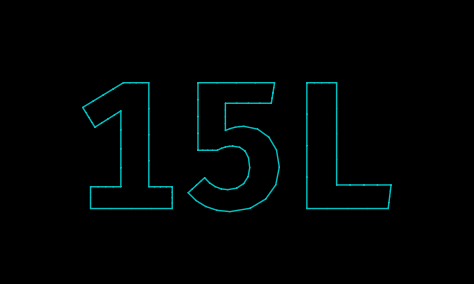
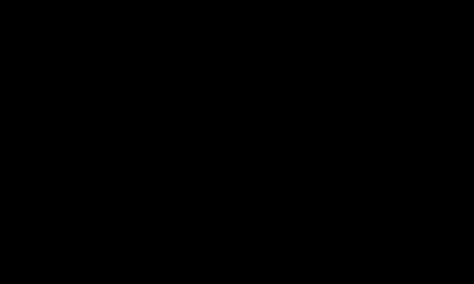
line: (123, 82) (148, 82) (148, 186) (172, 186) (172, 208) (90, 208) (90, 186) (120, 186) (120, 110) (94, 127) (82, 107) (123, 82) -> none
line: (197, 82) (274, 82) (271, 103) (225, 103) (225, 130) (243, 126) (257, 129) (268, 137) (276, 150) (279, 167) (275, 184) (265, 198) (250, 208) (229, 211) (217, 210) (205, 206) (188, 192) (204, 177) (209, 182) (221, 188) (236, 188) (243, 183) (248, 176) (249, 167) (248, 157) (245, 151) (239, 147) (229, 146) (217, 150) (197, 150) (197, 82) -> none
line: (306, 82) (306, 208) (388, 208) (391, 184) (336, 184) (336, 82) (306, 82) -> none

